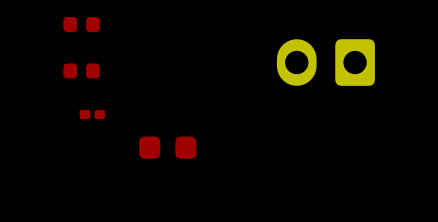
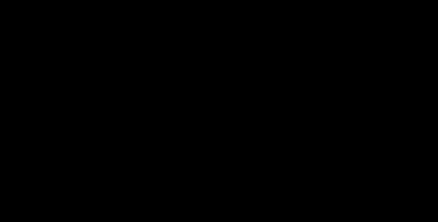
part: (81, 24) -> none
part: (325, 62) -> none
part: (81, 70) -> none
part: (92, 114) -> none
part: (167, 147) -> none

